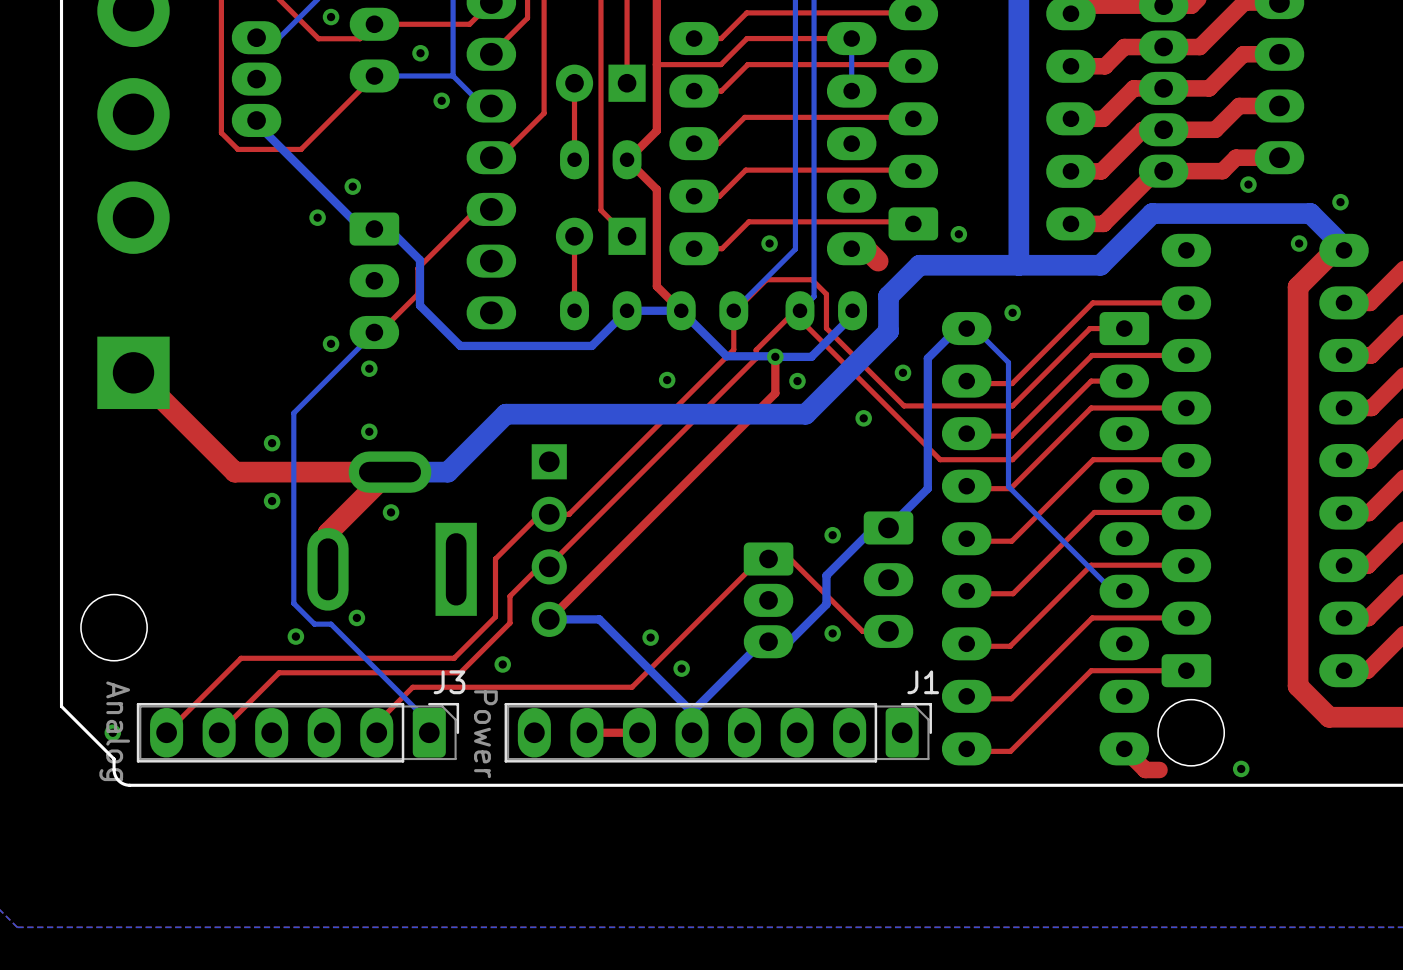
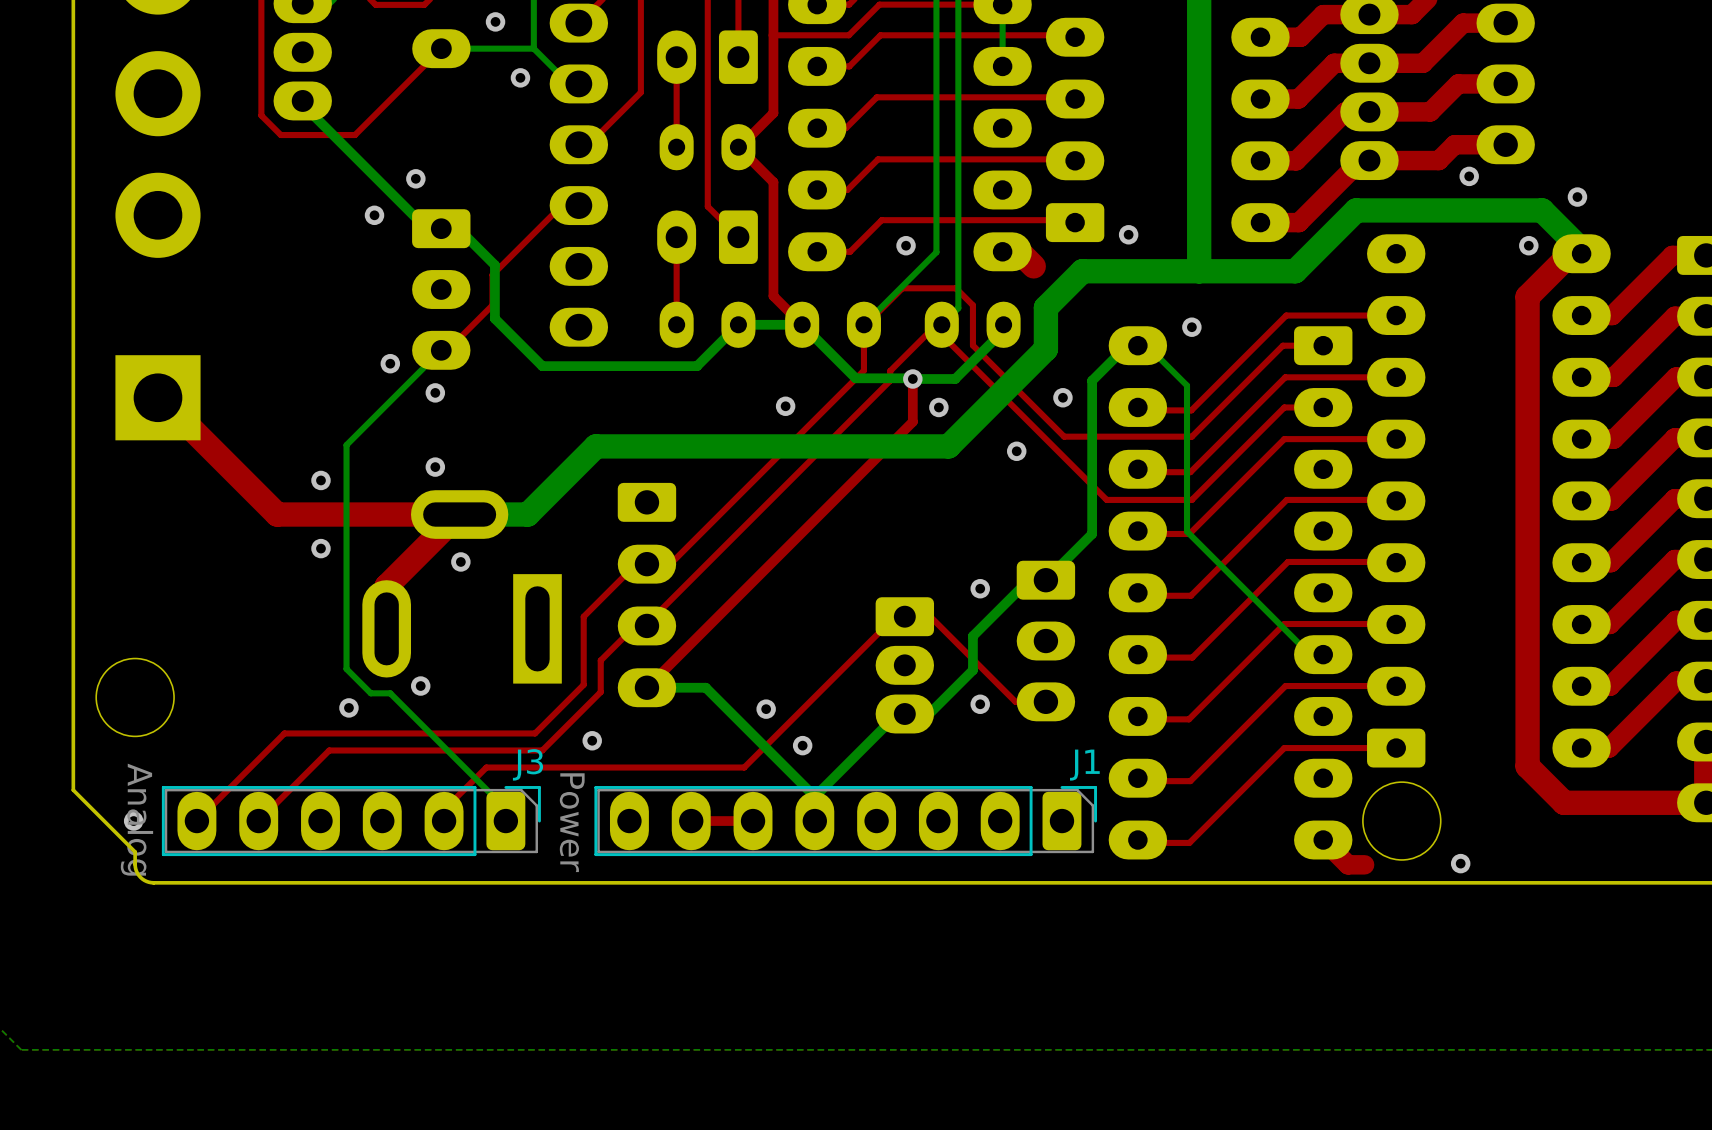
part footprint: [555, 64, 646, 102] -> [657, 30, 758, 84]
part footprint: [555, 217, 646, 255] -> [657, 210, 758, 264]
part footprint: [531, 444, 567, 637] -> [617, 482, 677, 708]

